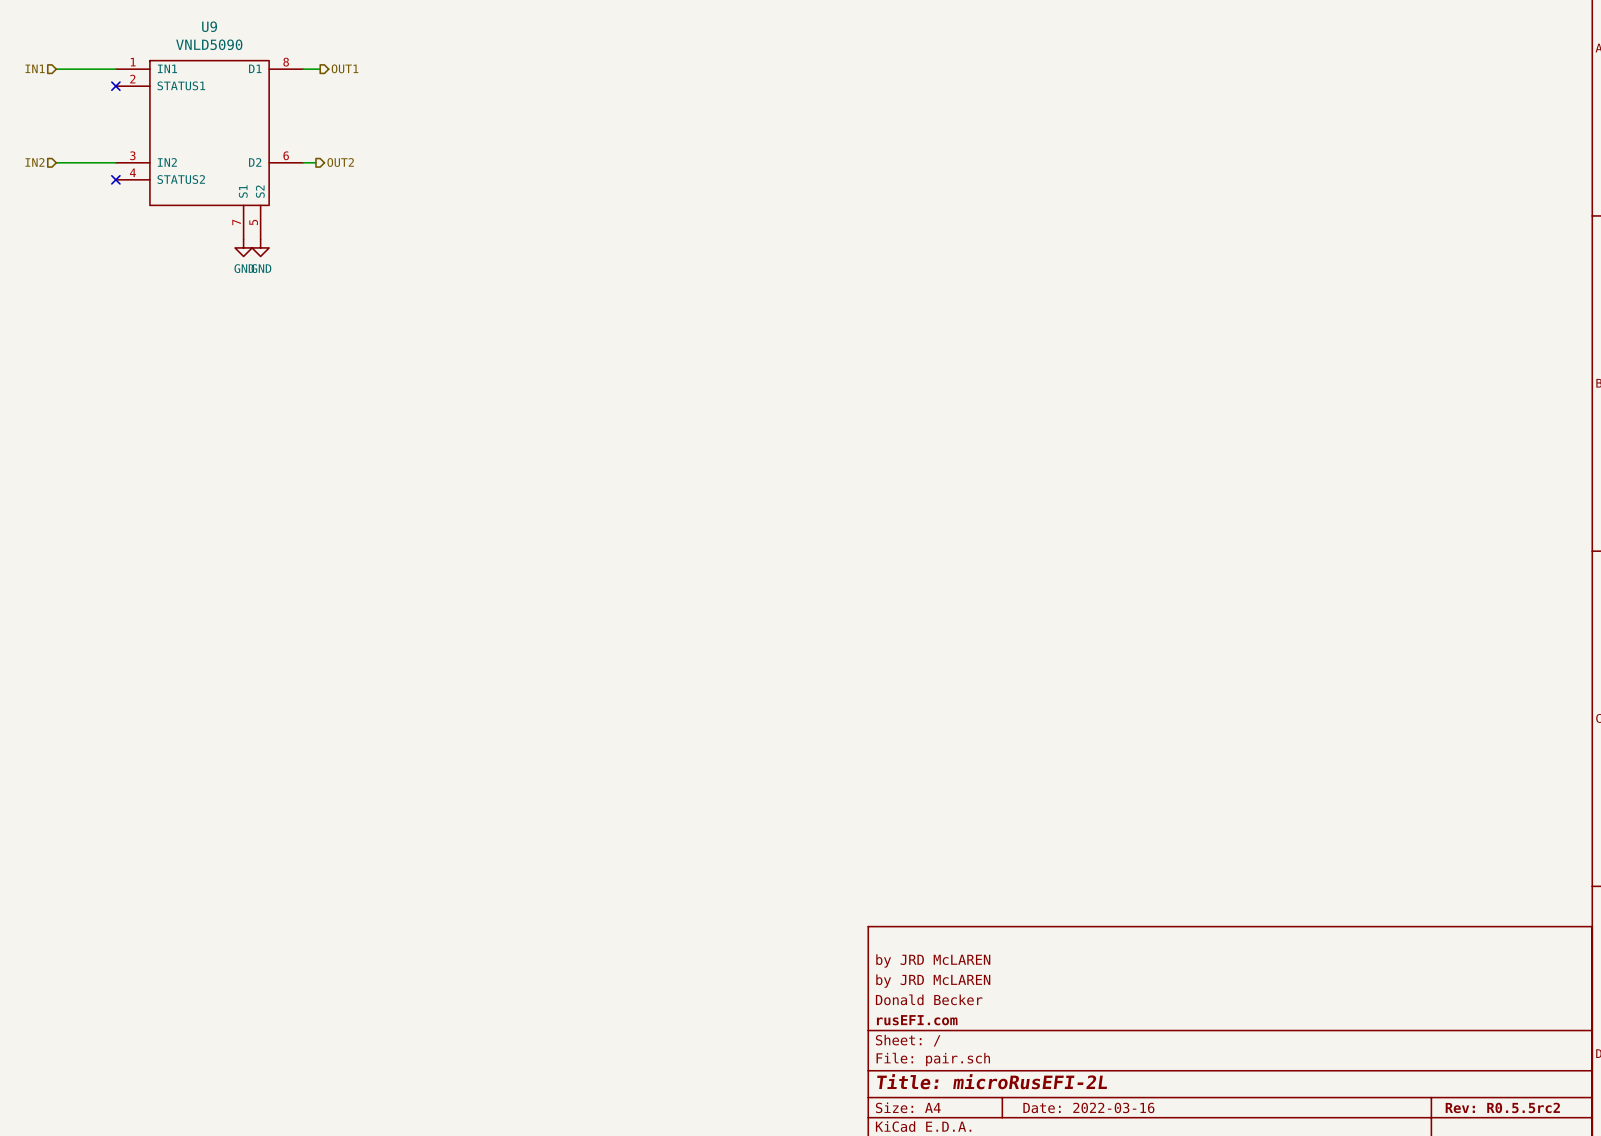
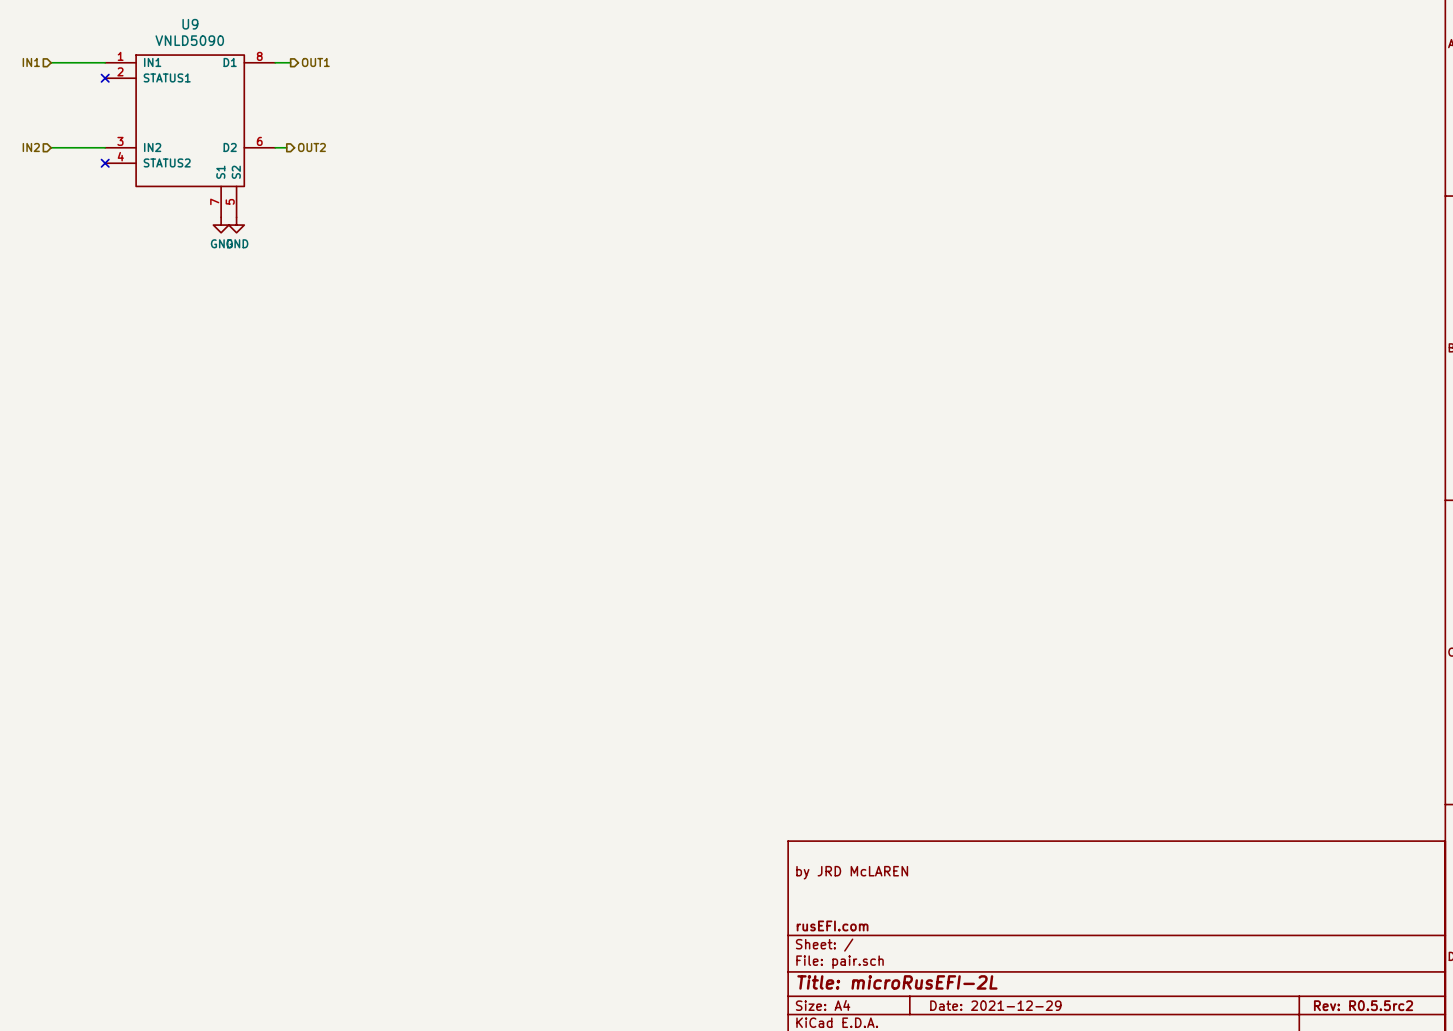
title block: by JRD McLAREN (933, 981) -> none
title block: Donald Becker (929, 999) -> none
title block: Date: 2022-03-16 (1088, 1107) -> Date: 2021-12-29 (995, 1005)

